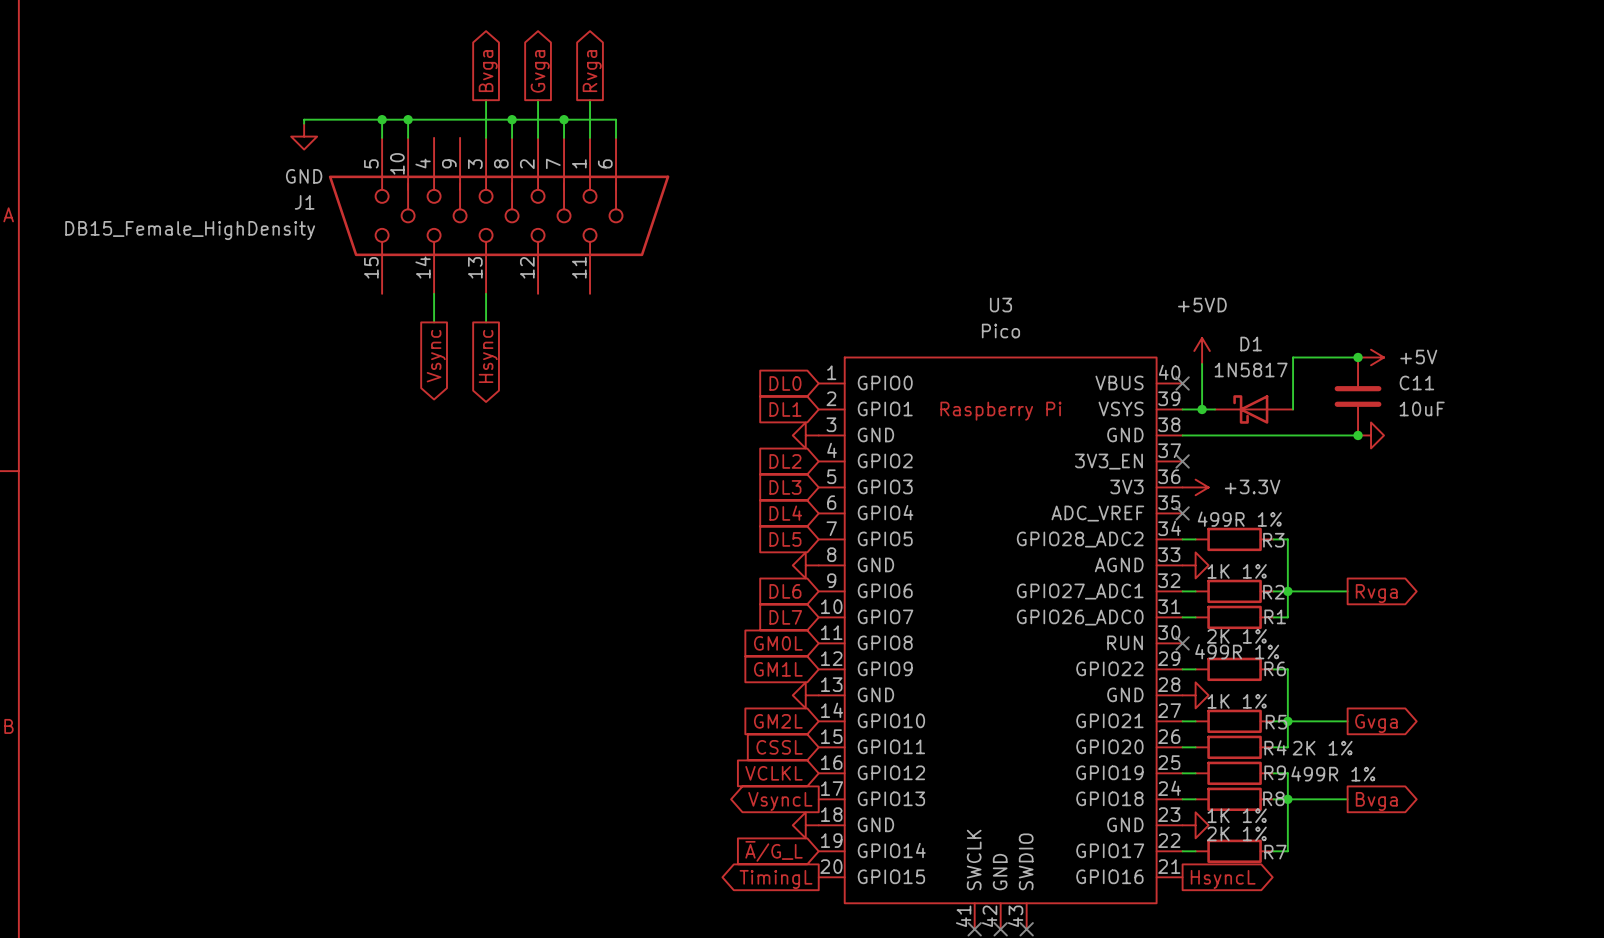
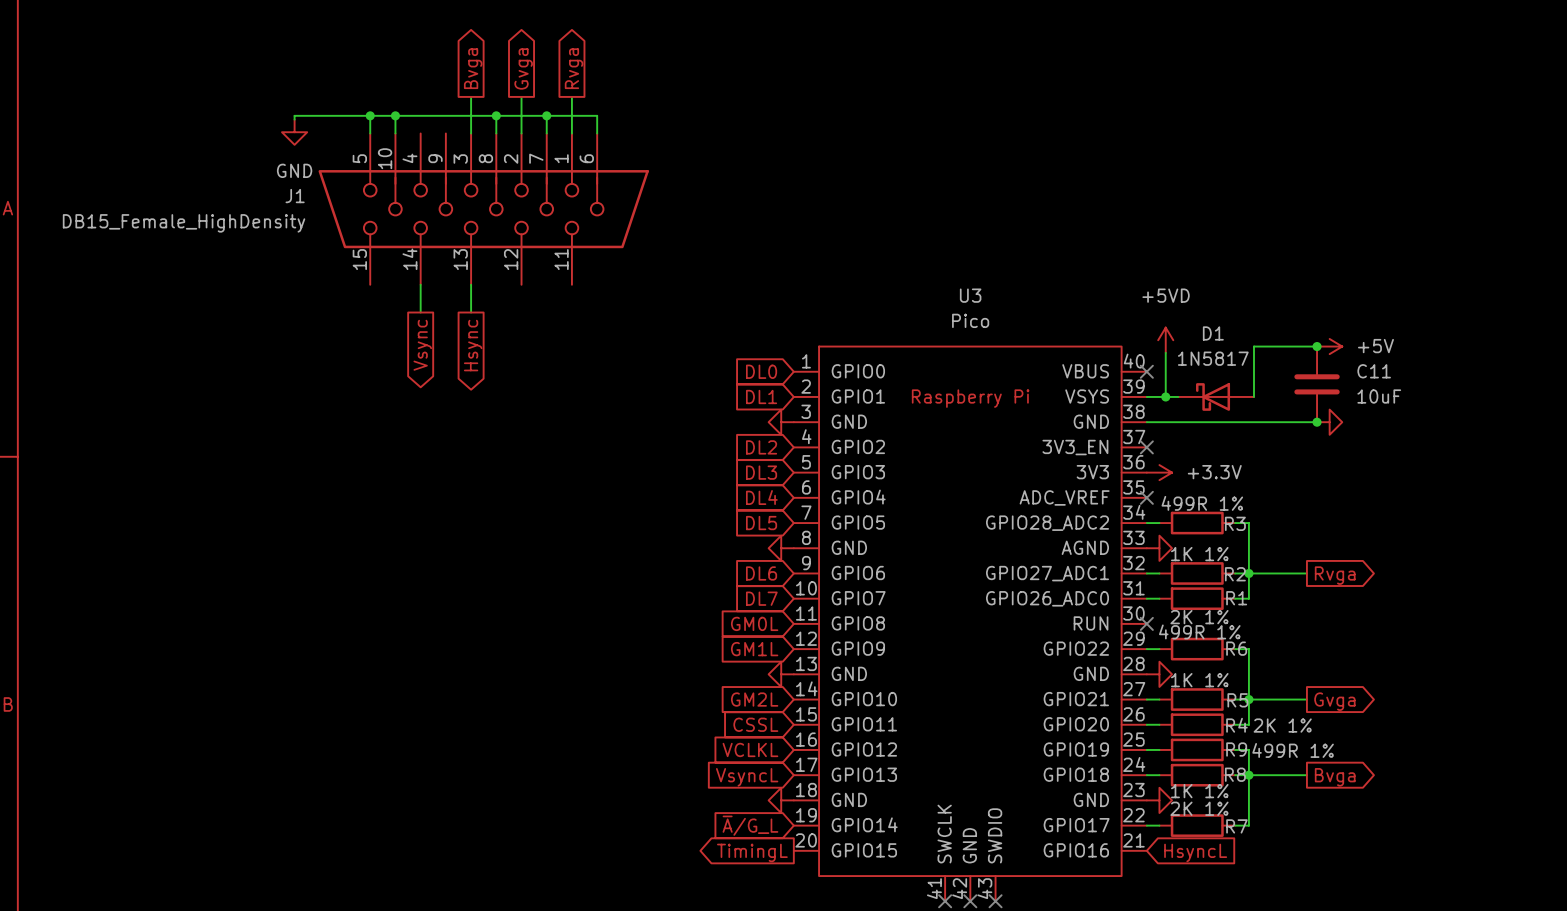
global label shape: output (780, 801) -> input (747, 777)
global label shape: output (1223, 879) -> input (1195, 852)

